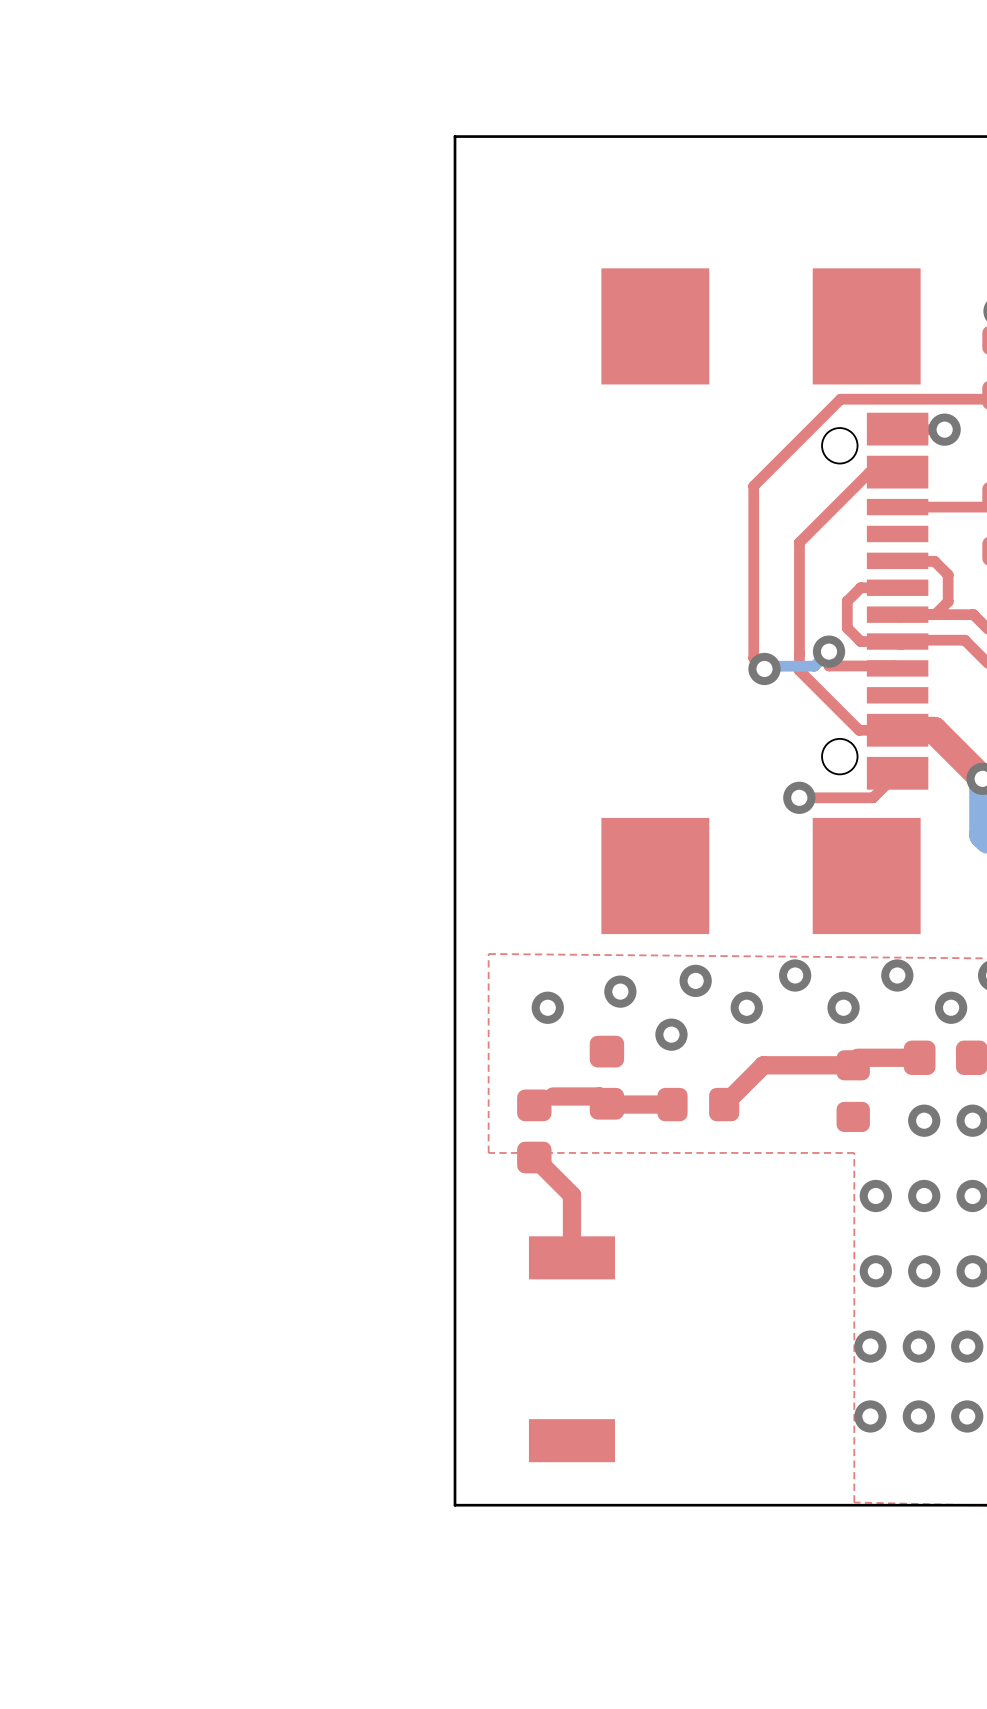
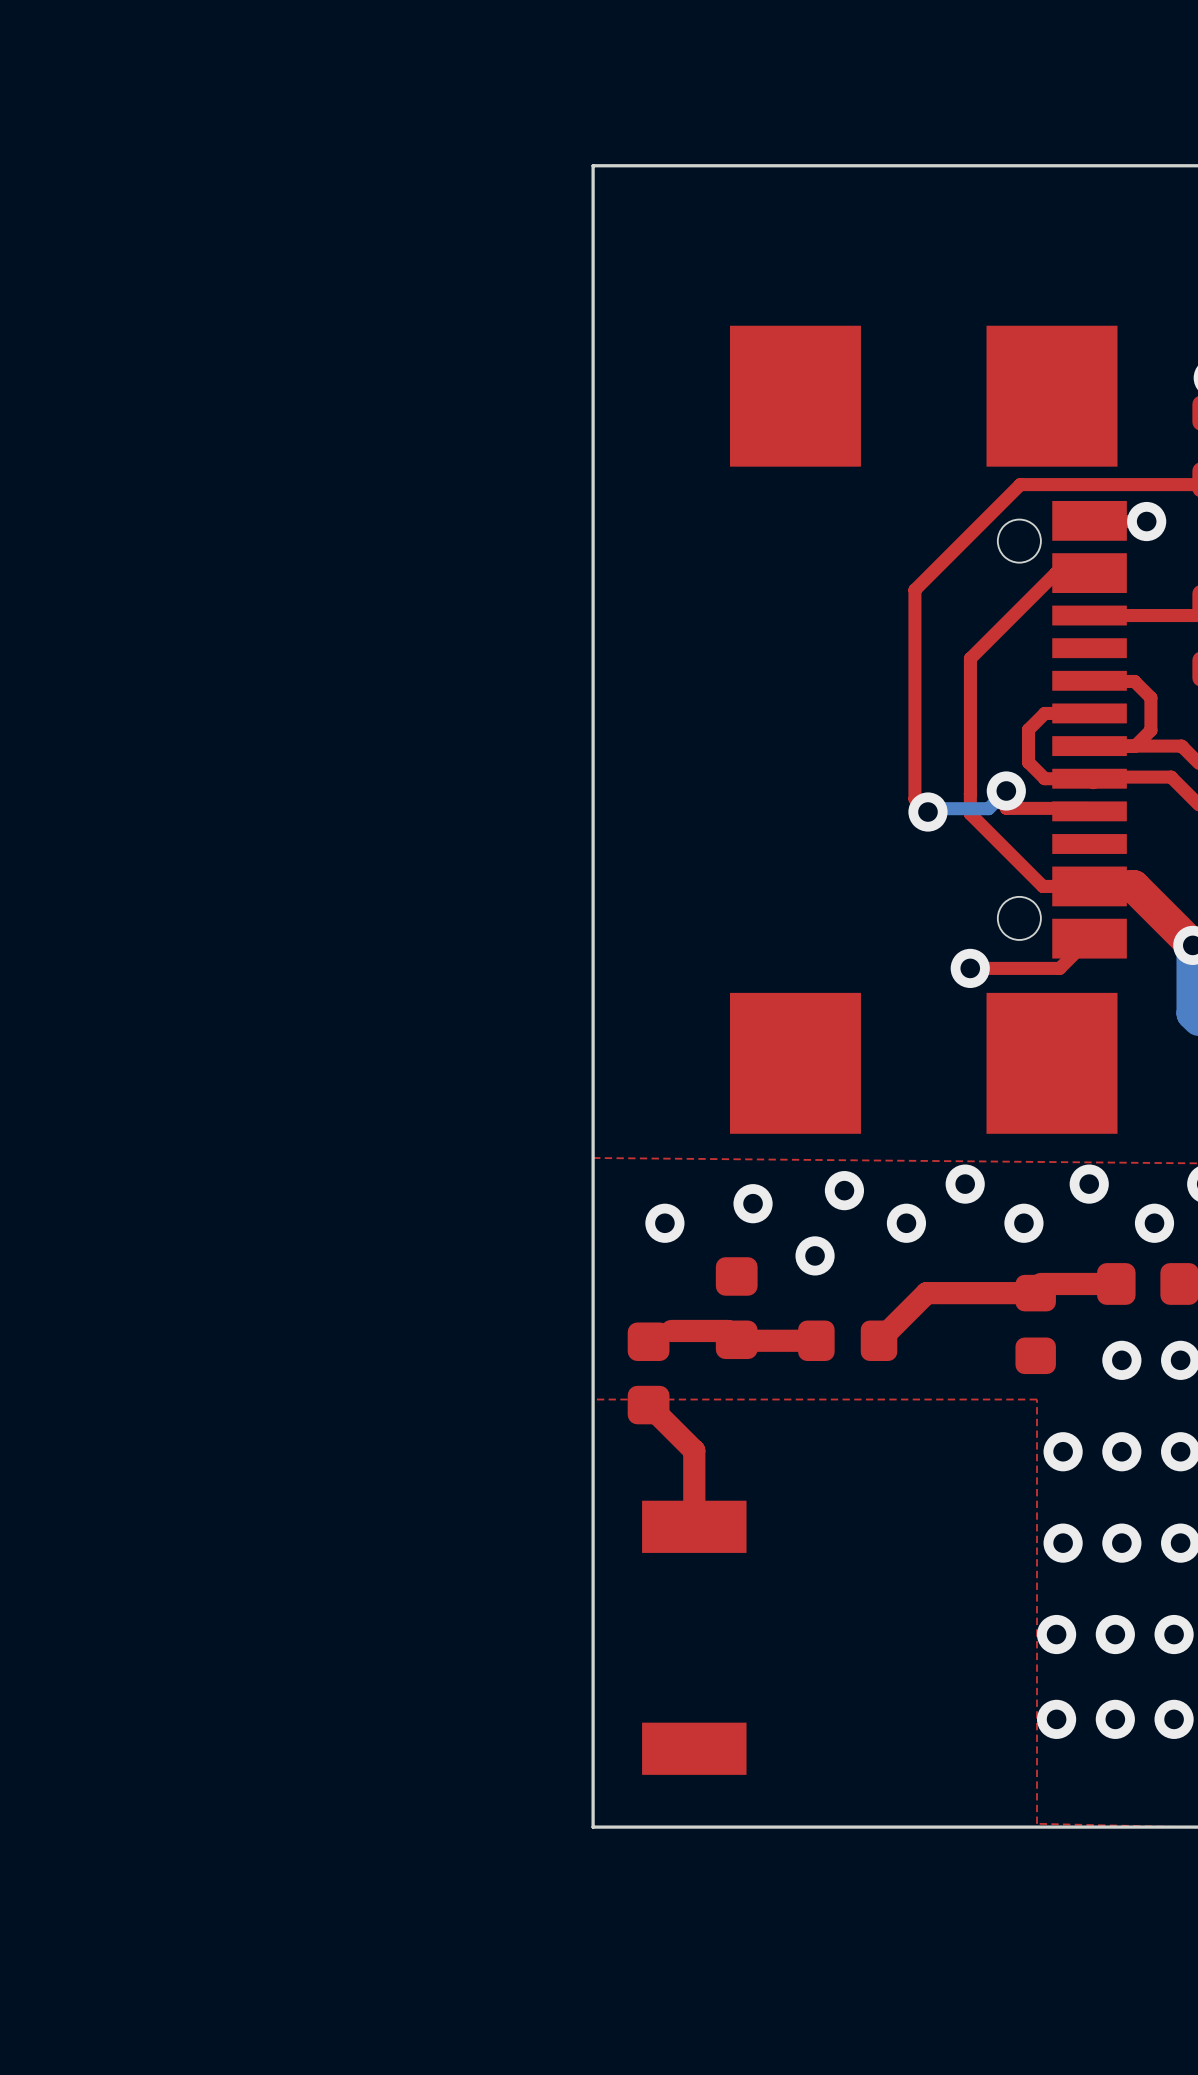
board edge: (488, 136) (455, 136) (455, 1505) (488, 1505) -> (593, 165) (593, 1827)

